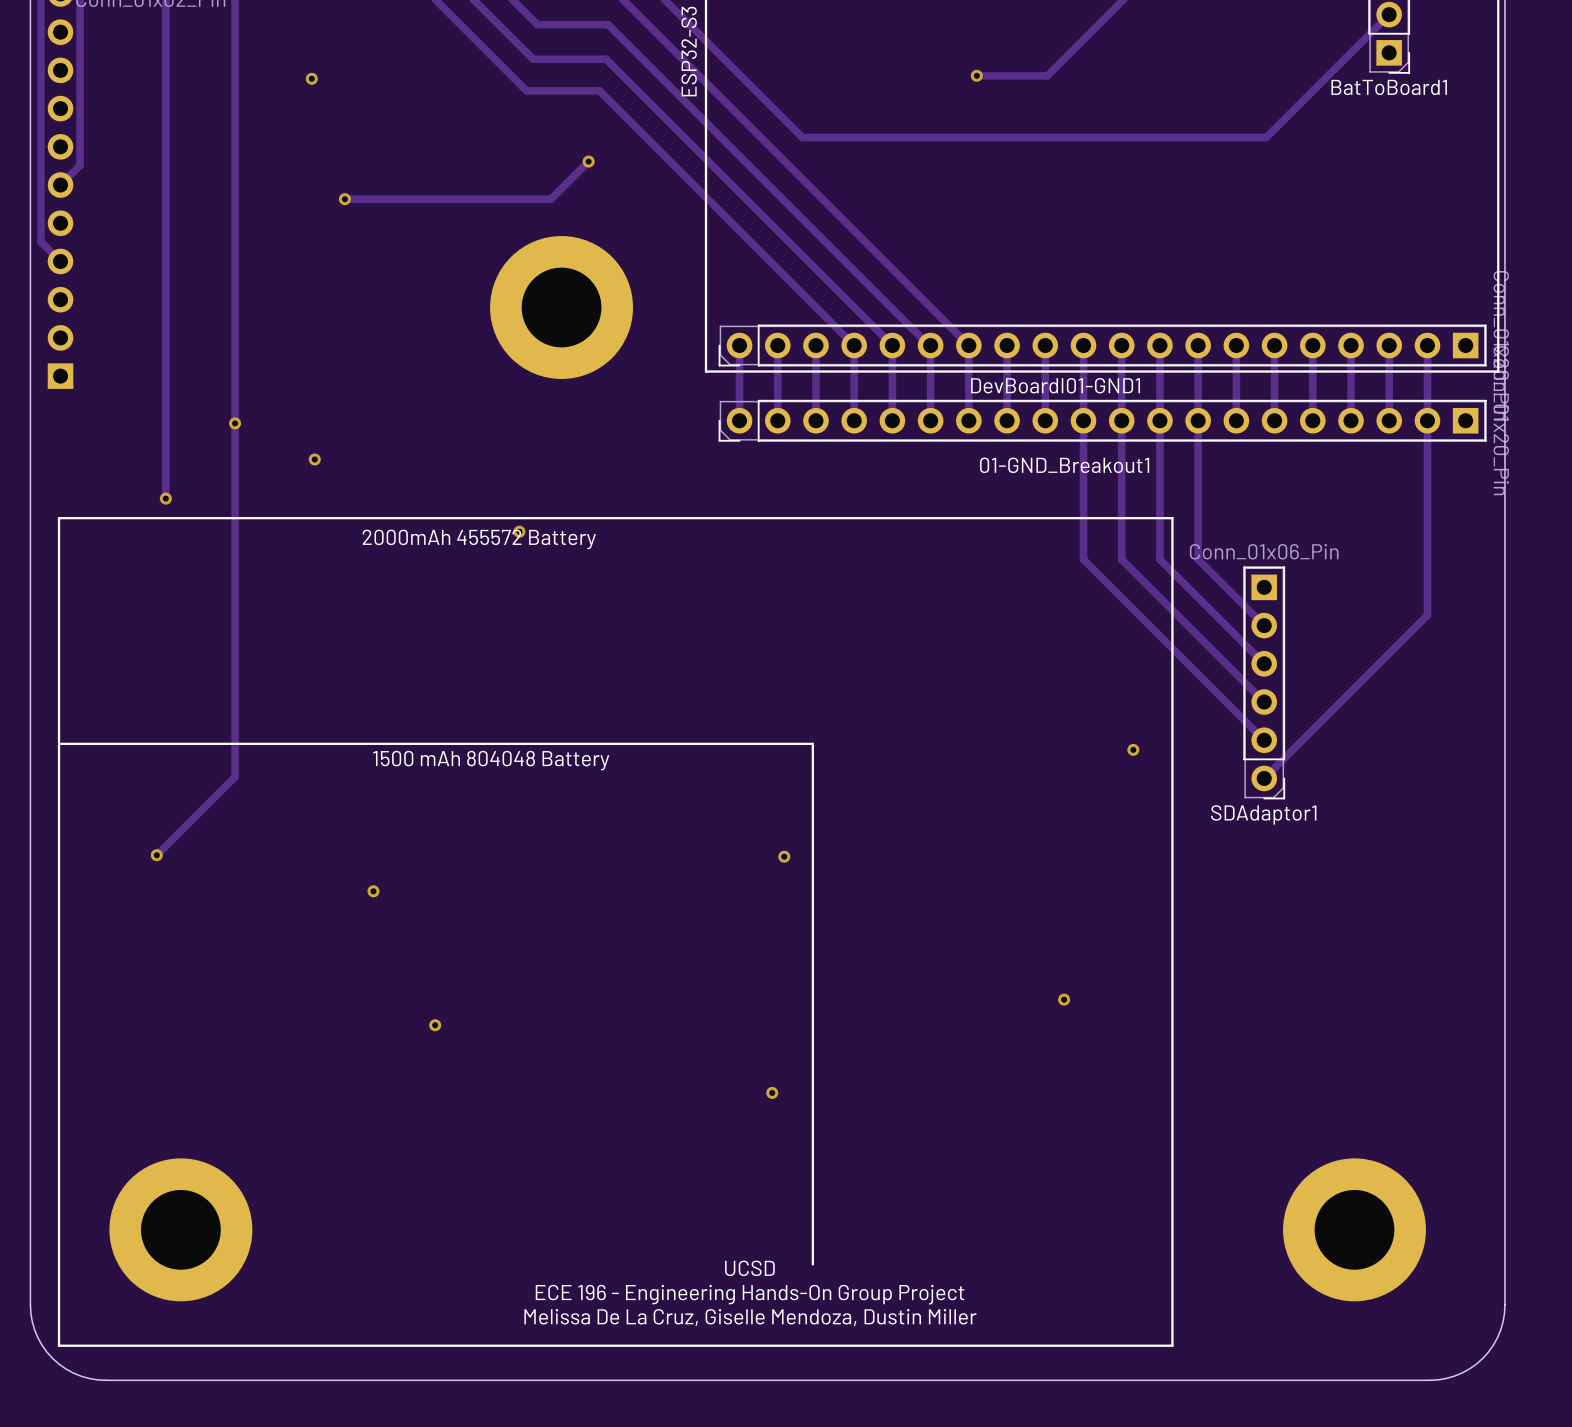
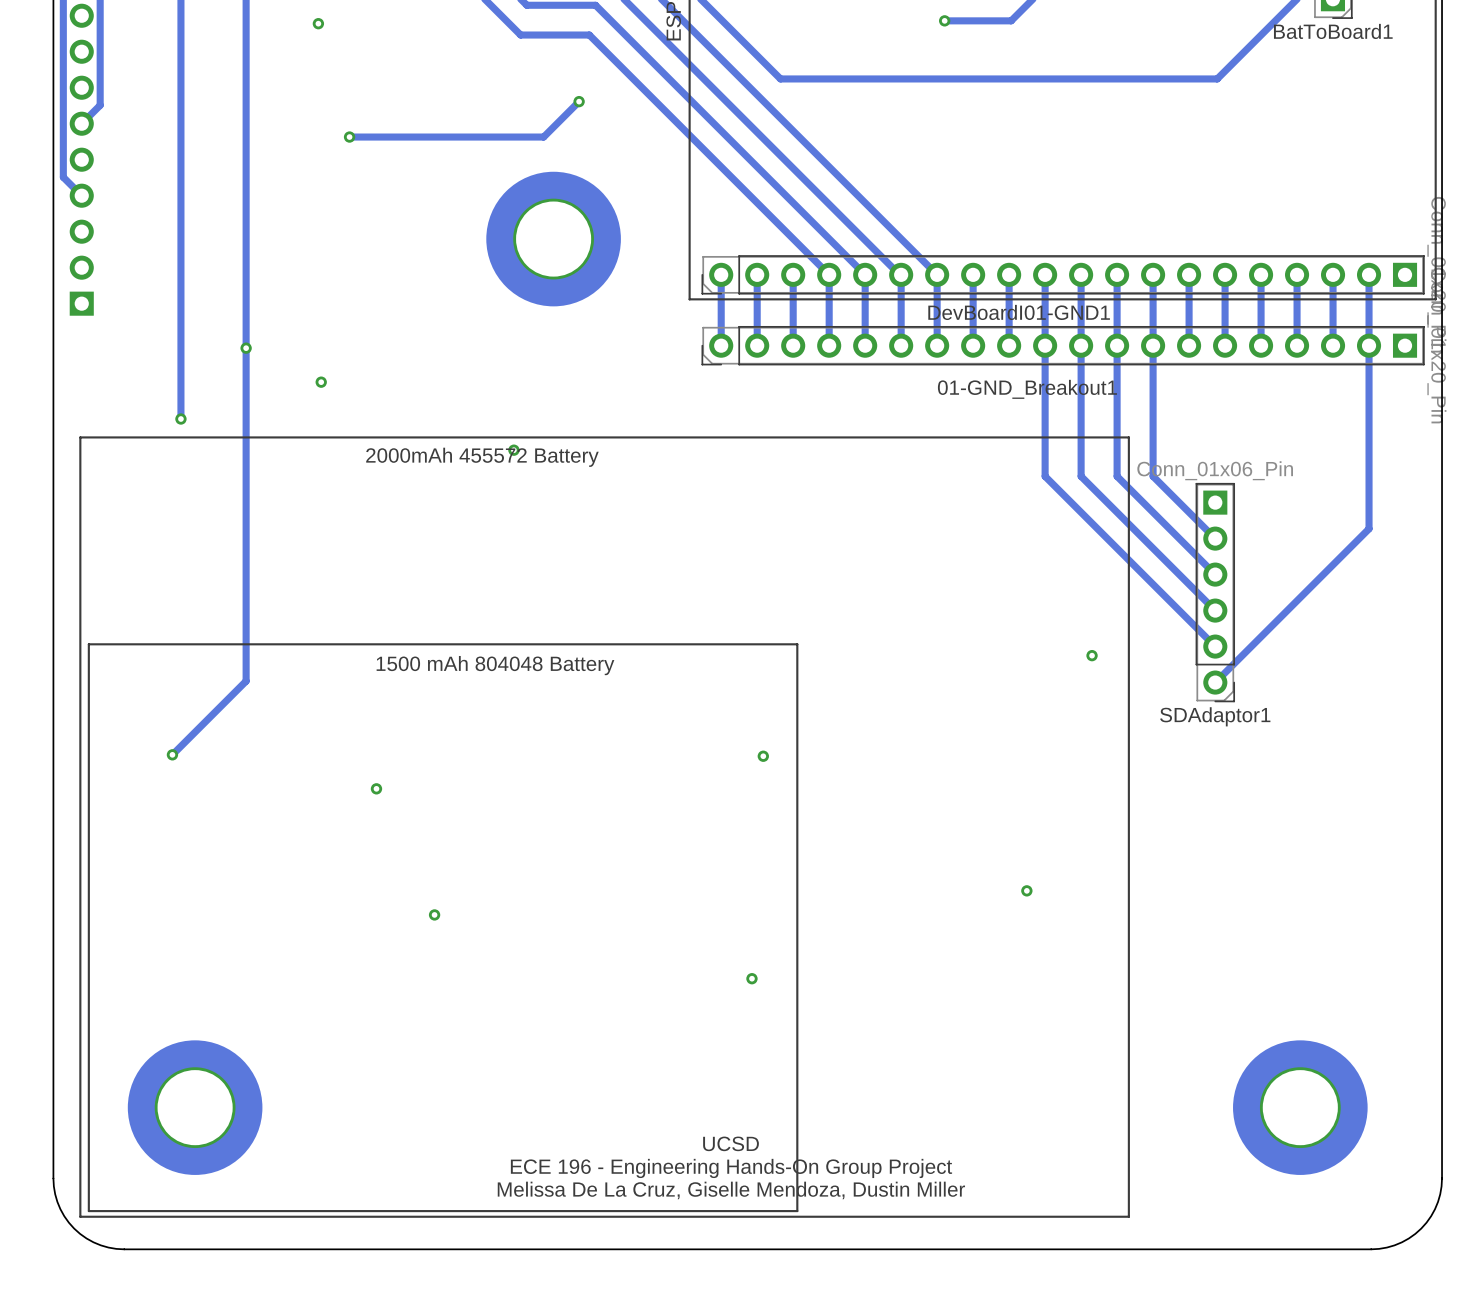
line: none -> (797, 644) (88, 644) (88, 1211) (797, 1211) (797, 644)
line: (60, 743) (812, 743) (812, 1264) -> none

